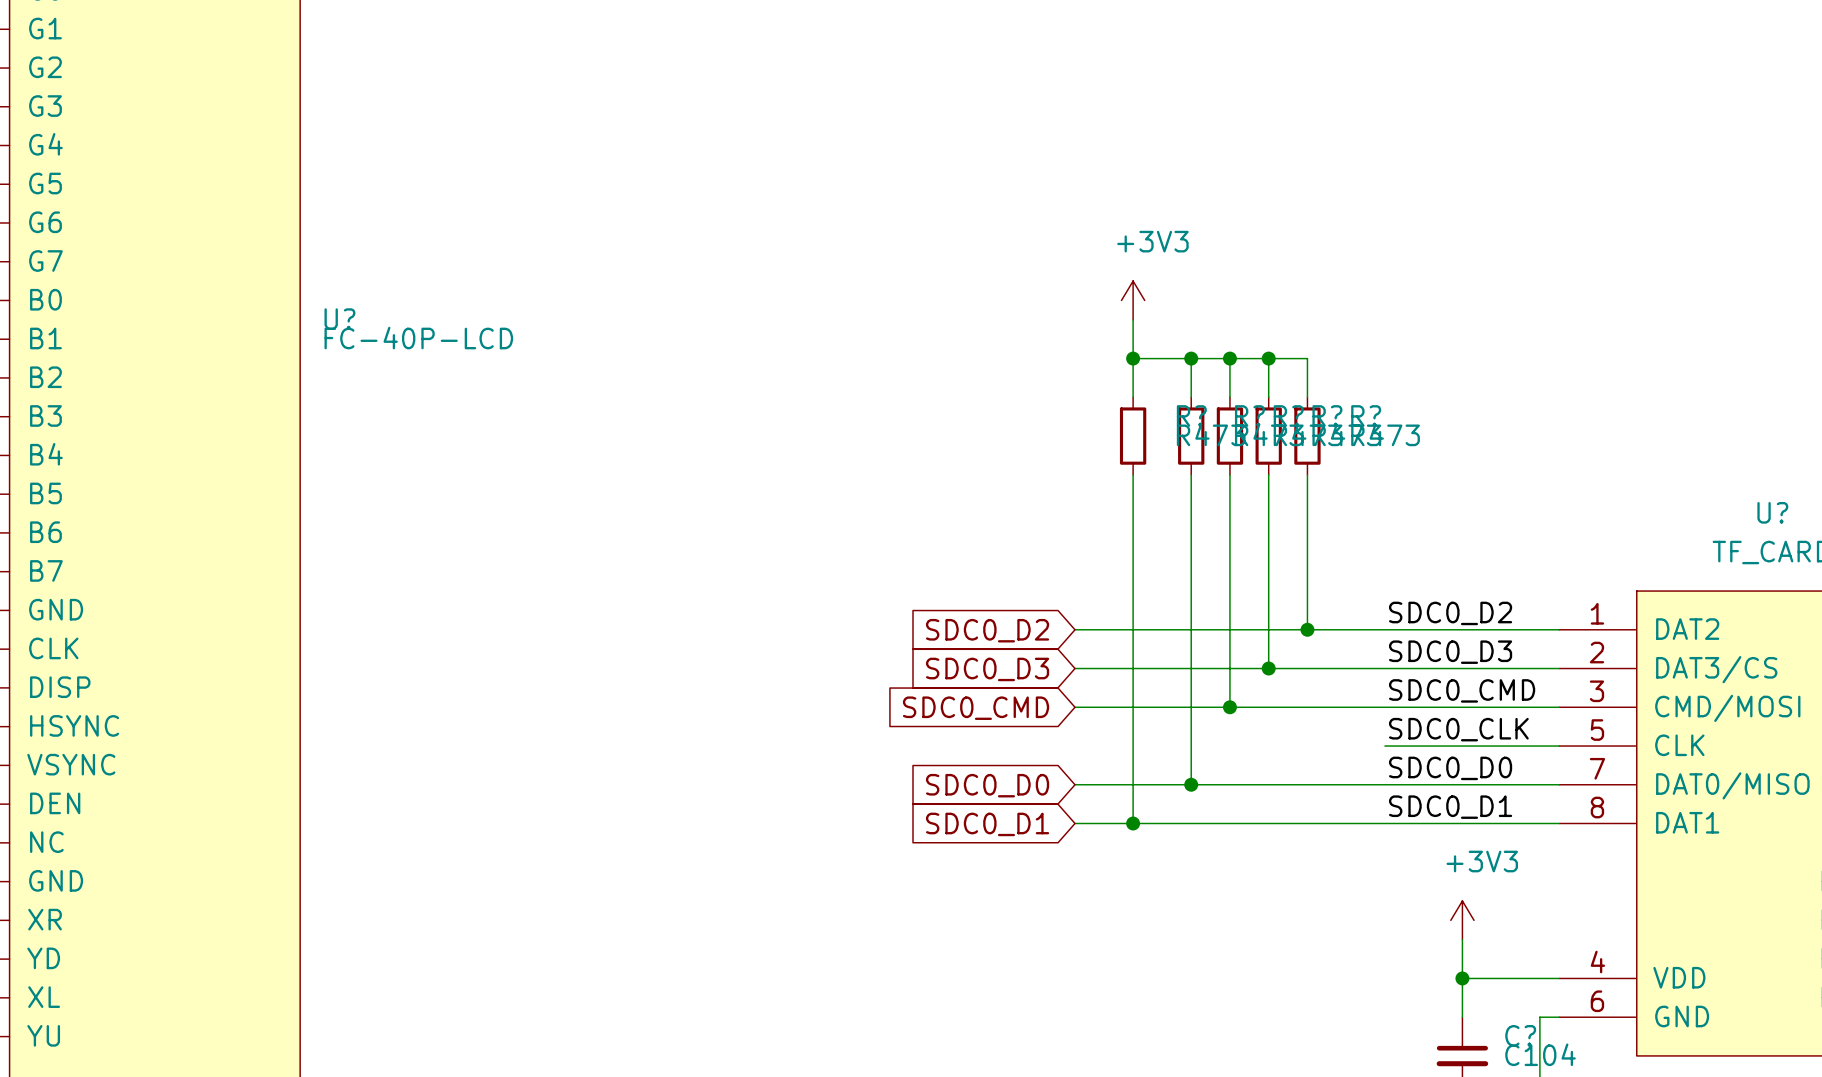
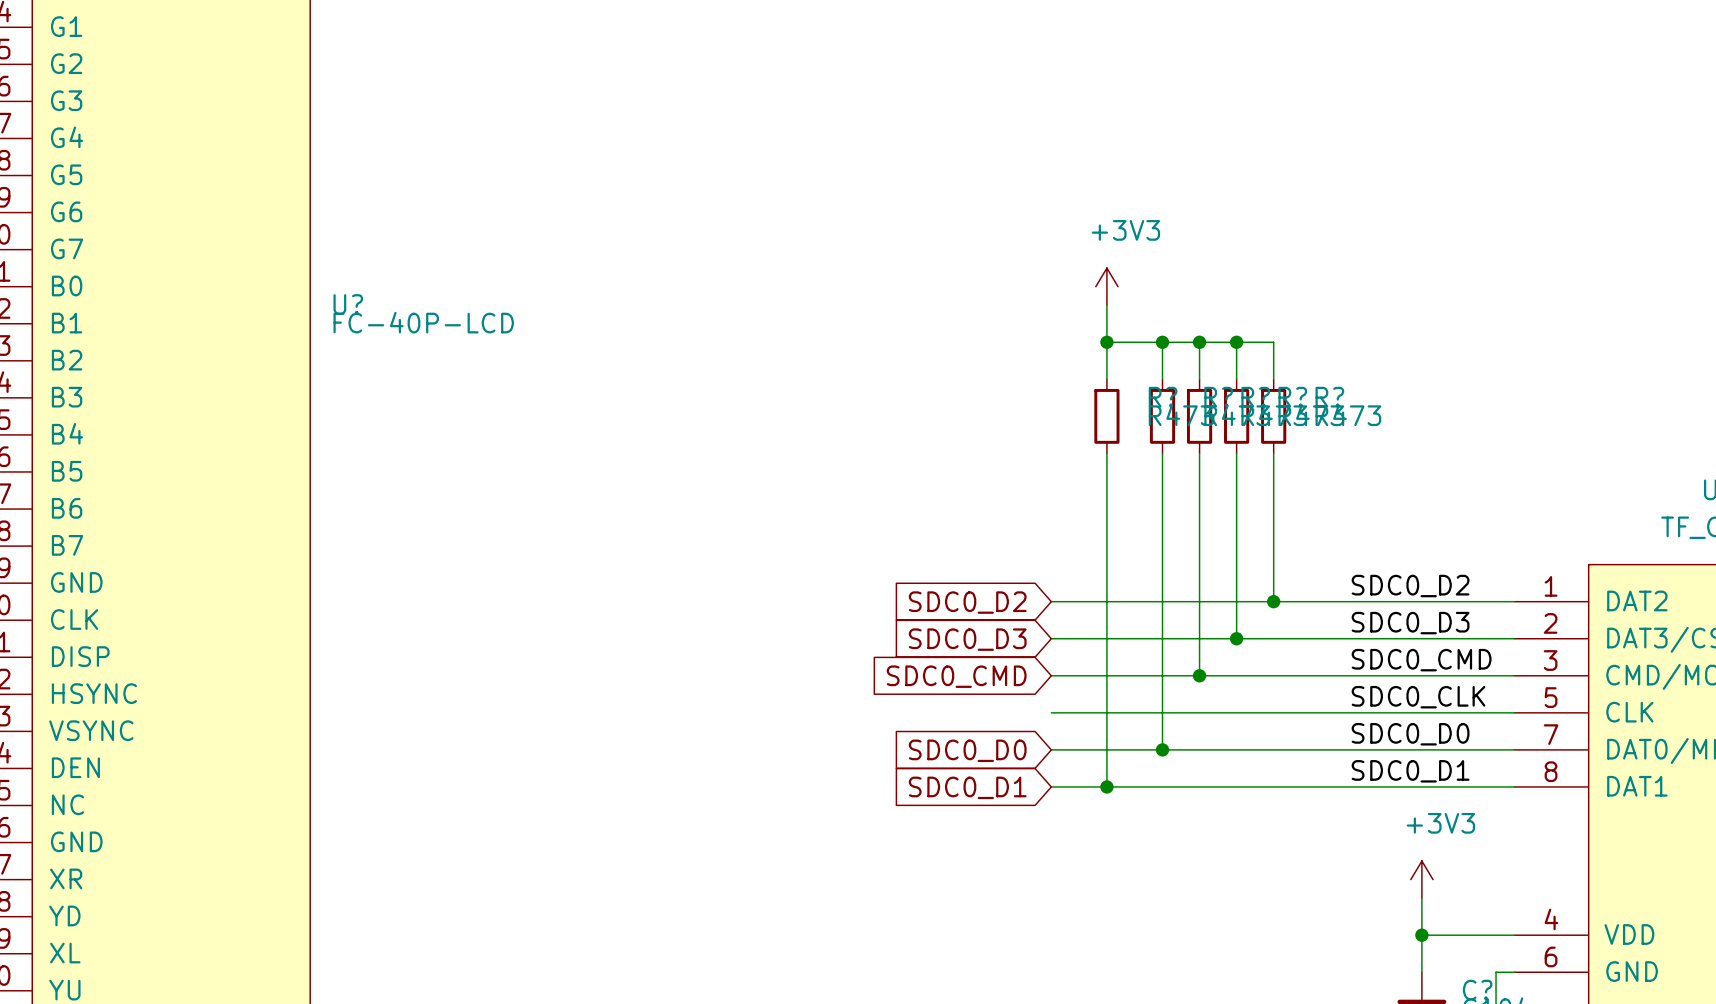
wire: none -> (1051, 712) (1347, 712)

